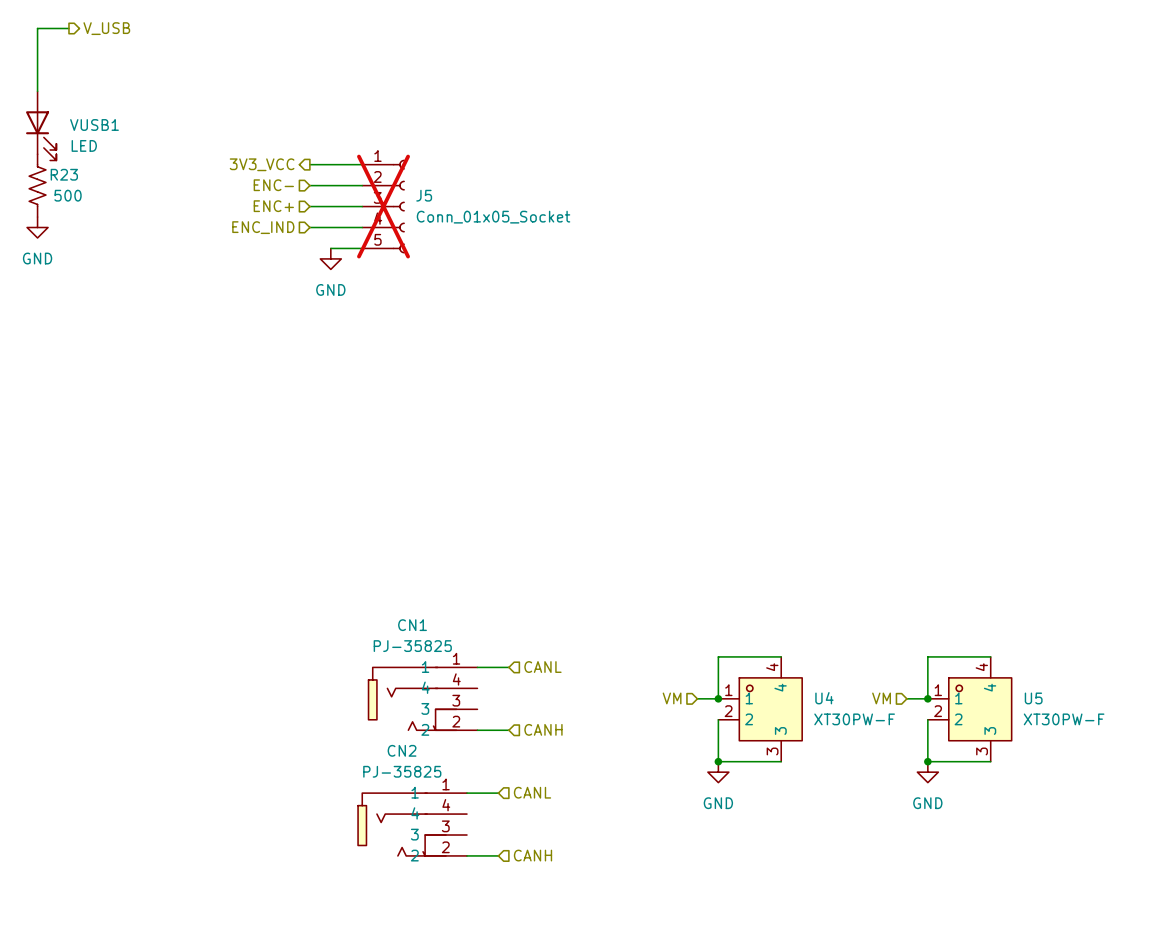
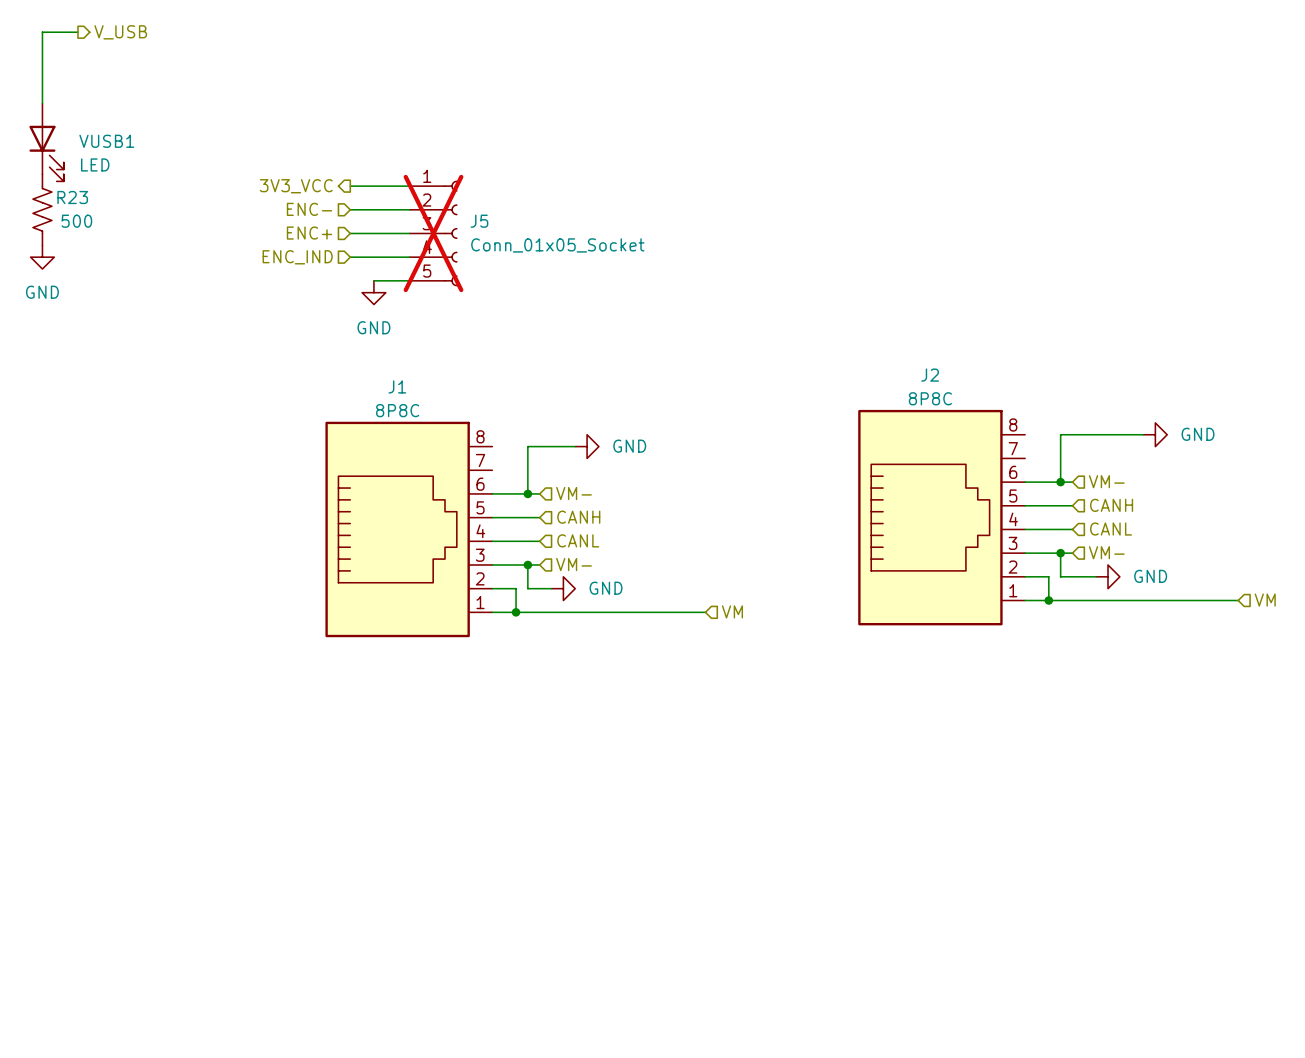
wire: none -> (1143, 434) (1060, 434) (1060, 482)
power symbol: none -> GND (1155, 434)
wire: none -> (575, 446) (527, 446) (527, 493)
power symbol: none -> GND (587, 446)
wire: none -> (1025, 482) (1072, 482)
junction: none -> (1060, 482)
hierarchical label: none -> VM- (1106, 481)
wire: none -> (492, 493) (539, 493)
junction: none -> (527, 493)
hierarchical label: none -> VM- (574, 493)
wire: none -> (1025, 505) (1072, 505)
hierarchical label: none -> CANH (1111, 505)
wire: none -> (492, 517) (539, 517)
hierarchical label: none -> CANH (578, 517)
J2: none -> 8P8C (941, 517)
J1: none -> 8P8C (408, 529)
wire: none -> (1025, 529) (1072, 529)
hierarchical label: none -> CANL (1111, 529)
wire: none -> (492, 541) (539, 541)
hierarchical label: none -> CANL (578, 540)
hierarchical label: none -> VM- (1106, 552)
wire: none -> (1025, 553) (1072, 553)
wire: none -> (1060, 553) (1060, 576) (1096, 576)
junction: none -> (1060, 553)
wire: none -> (492, 564) (539, 564)
wire: none -> (527, 564) (527, 588) (551, 588)
junction: none -> (527, 564)
hierarchical label: none -> VM- (574, 564)
wire: none -> (1025, 576) (1048, 576) (1048, 600)
power symbol: none -> GND (1108, 576)
wire: none -> (492, 588) (516, 588) (516, 612)
power symbol: none -> GND (563, 588)
hierarchical label: none -> VM (1265, 600)
wire: none -> (1025, 600) (1238, 600)
junction: none -> (1048, 600)
wire: none -> (492, 612) (705, 612)
junction: none -> (516, 612)
hierarchical label: none -> VM (732, 611)
wire: (781, 656) (718, 656) (718, 698) (697, 698) -> none
wire: (990, 656) (927, 656) (927, 698) (906, 698) -> none
wire: (477, 667) (508, 667) -> none
hierarchical label: CANL (542, 667) -> none
CN1: PJ-35825 (423, 698) -> none
hierarchical label: VM (672, 698) -> none
junction: (718, 698) -> none
hierarchical label: VM (881, 698) -> none
junction: (927, 698) -> none
U4: XT30PW-F (760, 709) -> none
U5: XT30PW-F (969, 709) -> none
wire: (718, 719) (718, 761) (781, 761) -> none
wire: (927, 719) (927, 761) (990, 761) -> none
hierarchical label: CANH (543, 729) -> none
wire: (477, 730) (508, 730) -> none
junction: (718, 761) -> none
junction: (927, 761) -> none
power symbol: GND (718, 772) -> none
power symbol: GND (927, 772) -> none
hierarchical label: CANL (532, 792) -> none
wire: (467, 793) (498, 793) -> none
CN2: PJ-35825 (412, 824) -> none
wire: (467, 855) (498, 855) -> none
hierarchical label: CANH (533, 855) -> none

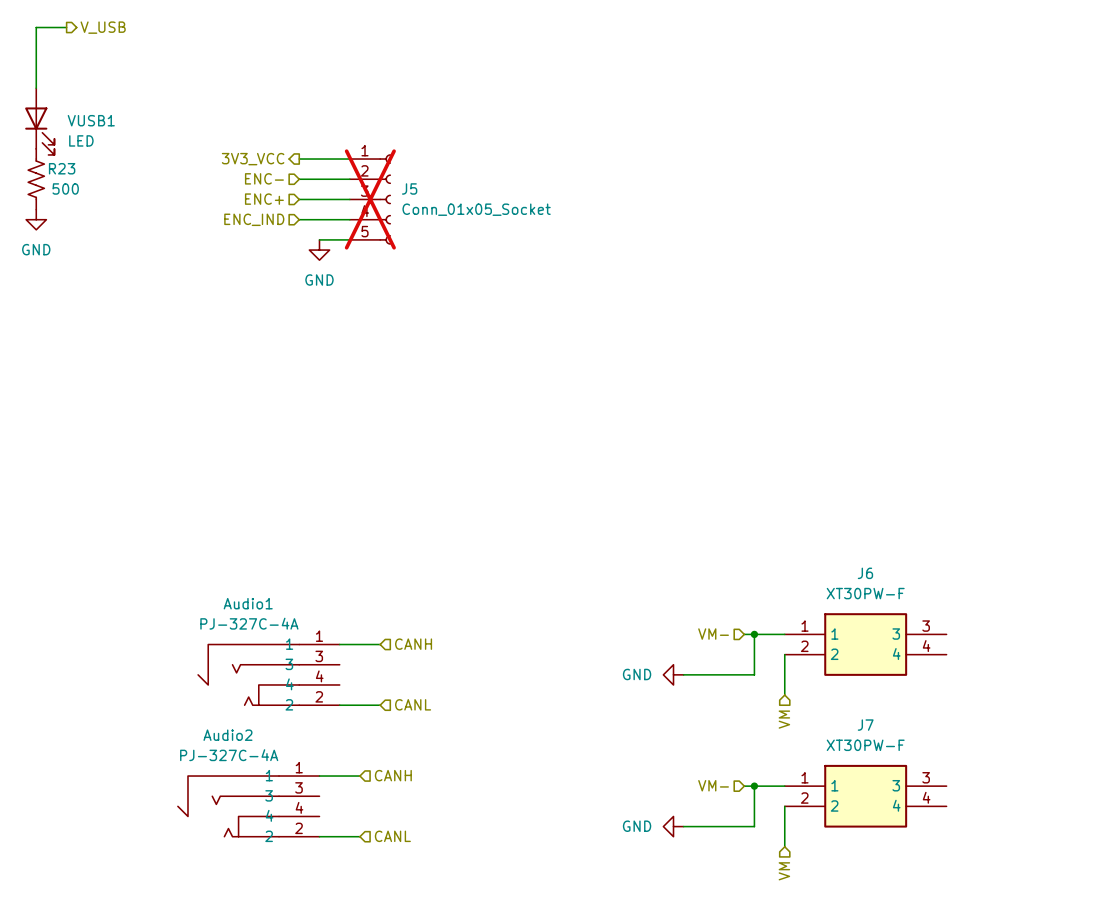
wire: (1143, 434) (1060, 434) (1060, 482) -> none
power symbol: GND (1155, 434) -> none
wire: (575, 446) (527, 446) (527, 493) -> none
power symbol: GND (587, 446) -> none
hierarchical label: VM- (1106, 481) -> none
wire: (1025, 482) (1072, 482) -> none
junction: (1060, 482) -> none
wire: (492, 493) (539, 493) -> none
junction: (527, 493) -> none
hierarchical label: VM- (574, 493) -> none
wire: (1025, 505) (1072, 505) -> none
hierarchical label: CANH (1111, 505) -> none
wire: (492, 517) (539, 517) -> none
hierarchical label: CANH (578, 517) -> none
J2: 8P8C (941, 517) -> none
J1: 8P8C (408, 529) -> none
wire: (1025, 529) (1072, 529) -> none
hierarchical label: CANL (1111, 529) -> none
hierarchical label: CANL (578, 540) -> none
wire: (492, 541) (539, 541) -> none
hierarchical label: VM- (1106, 552) -> none
wire: (1025, 553) (1072, 553) -> none
wire: (1060, 553) (1060, 576) (1096, 576) -> none
junction: (1060, 553) -> none
wire: (492, 564) (539, 564) -> (339, 644) (380, 644)
wire: (527, 564) (527, 588) (551, 588) -> none
junction: (527, 564) -> none
hierarchical label: VM- (574, 564) -> none
wire: (1025, 576) (1048, 576) (1048, 600) -> none
power symbol: GND (1108, 576) -> none
wire: (492, 588) (516, 588) (516, 612) -> none
power symbol: GND (563, 588) -> none
wire: (1025, 600) (1238, 600) -> none
junction: (1048, 600) -> none
hierarchical label: VM (1265, 600) -> none
hierarchical label: VM (732, 611) -> none
wire: (492, 612) (705, 612) -> none
junction: (516, 612) -> none
hierarchical label: none -> VM- (713, 634)
wire: none -> (744, 634) (784, 634)
wire: none -> (754, 634) (754, 674) (683, 674)
junction: none -> (754, 634)
hierarchical label: none -> CANH (413, 644)
J6: none -> XT30PW-F (865, 644)
wire: none -> (784, 654) (784, 695)
Audio1: none -> PJ-327C-4A (268, 674)
power symbol: none -> GND (673, 674)
wire: none -> (339, 705) (380, 705)
hierarchical label: none -> CANL (413, 704)
hierarchical label: none -> VM (784, 719)
hierarchical label: none -> CANH (393, 775)
wire: none -> (319, 776) (359, 776)
hierarchical label: none -> VM- (713, 785)
wire: none -> (744, 786) (784, 786)
wire: none -> (754, 786) (754, 826) (683, 826)
junction: none -> (754, 786)
J7: none -> XT30PW-F (865, 796)
Audio2: none -> PJ-327C-4A (248, 806)
wire: none -> (784, 806) (784, 846)
power symbol: none -> GND (673, 826)
hierarchical label: none -> CANL (392, 836)
wire: none -> (319, 836) (359, 836)
hierarchical label: none -> VM (784, 871)

